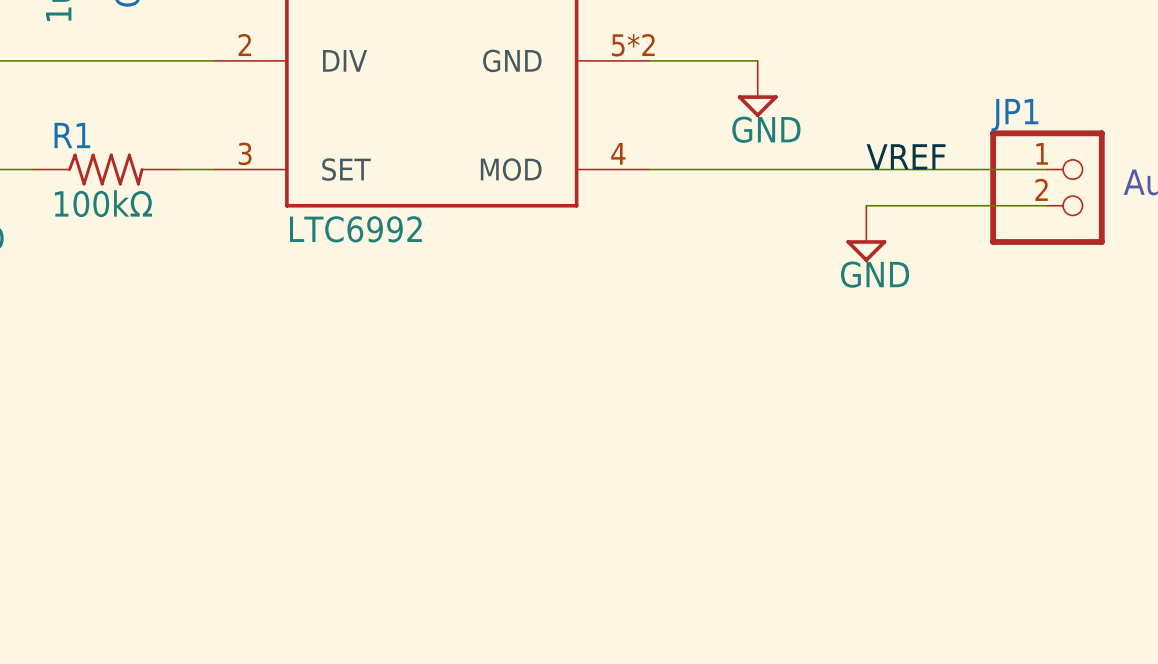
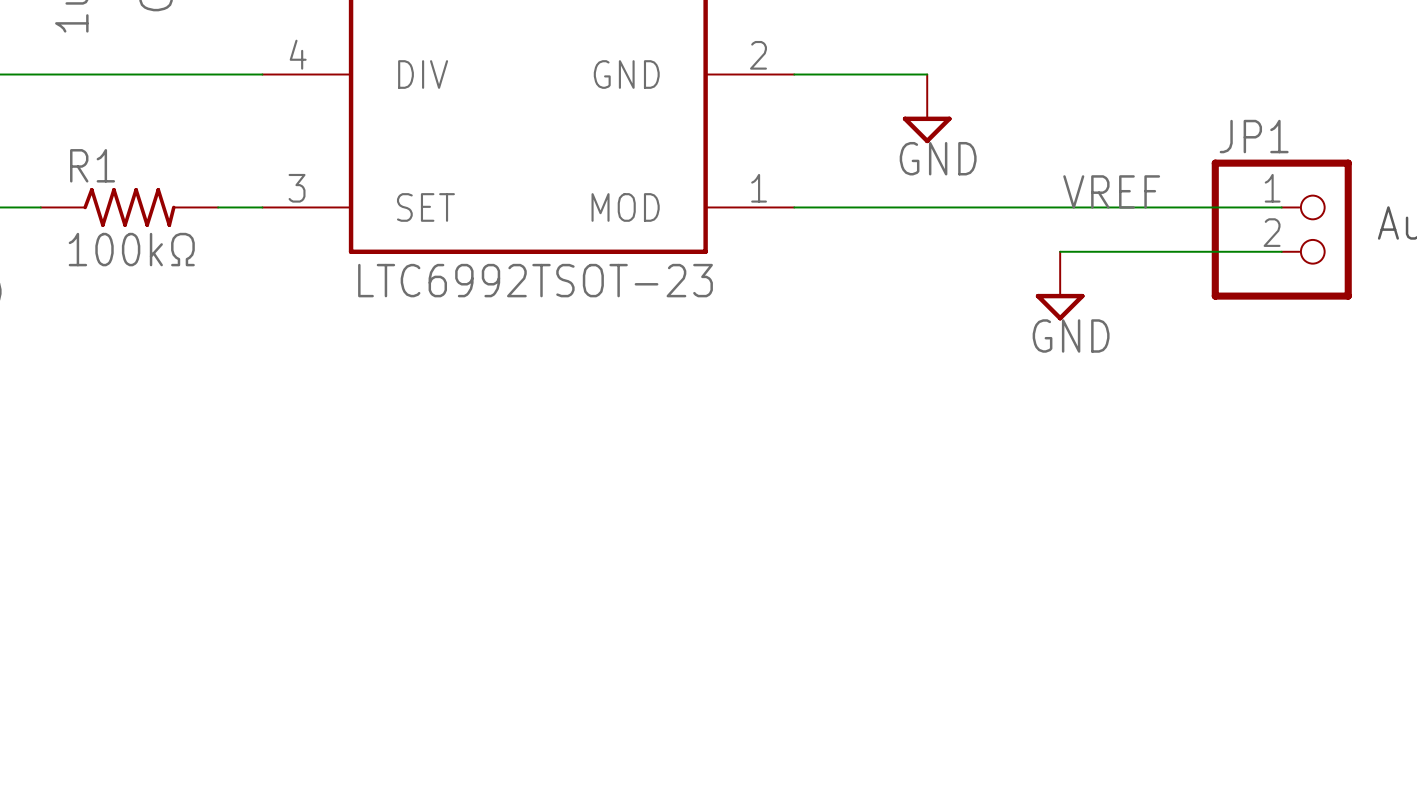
part pin number: 2 (244, 45) -> 4 (298, 54)
part pin number: 5*2 (633, 45) -> 2 (758, 55)
part pin number: 4 (618, 153) -> 1 (759, 188)
part value: LTC6992 (355, 229) -> LTC6992TSOT-23 (535, 280)

